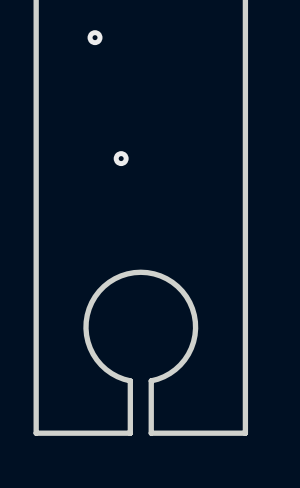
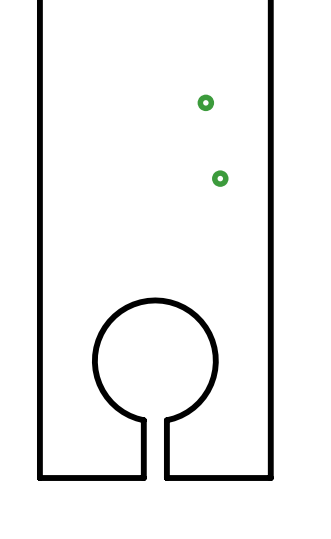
via: (95, 37) -> none
via: none -> (205, 102)
via: (121, 158) -> none
via: none -> (220, 178)

